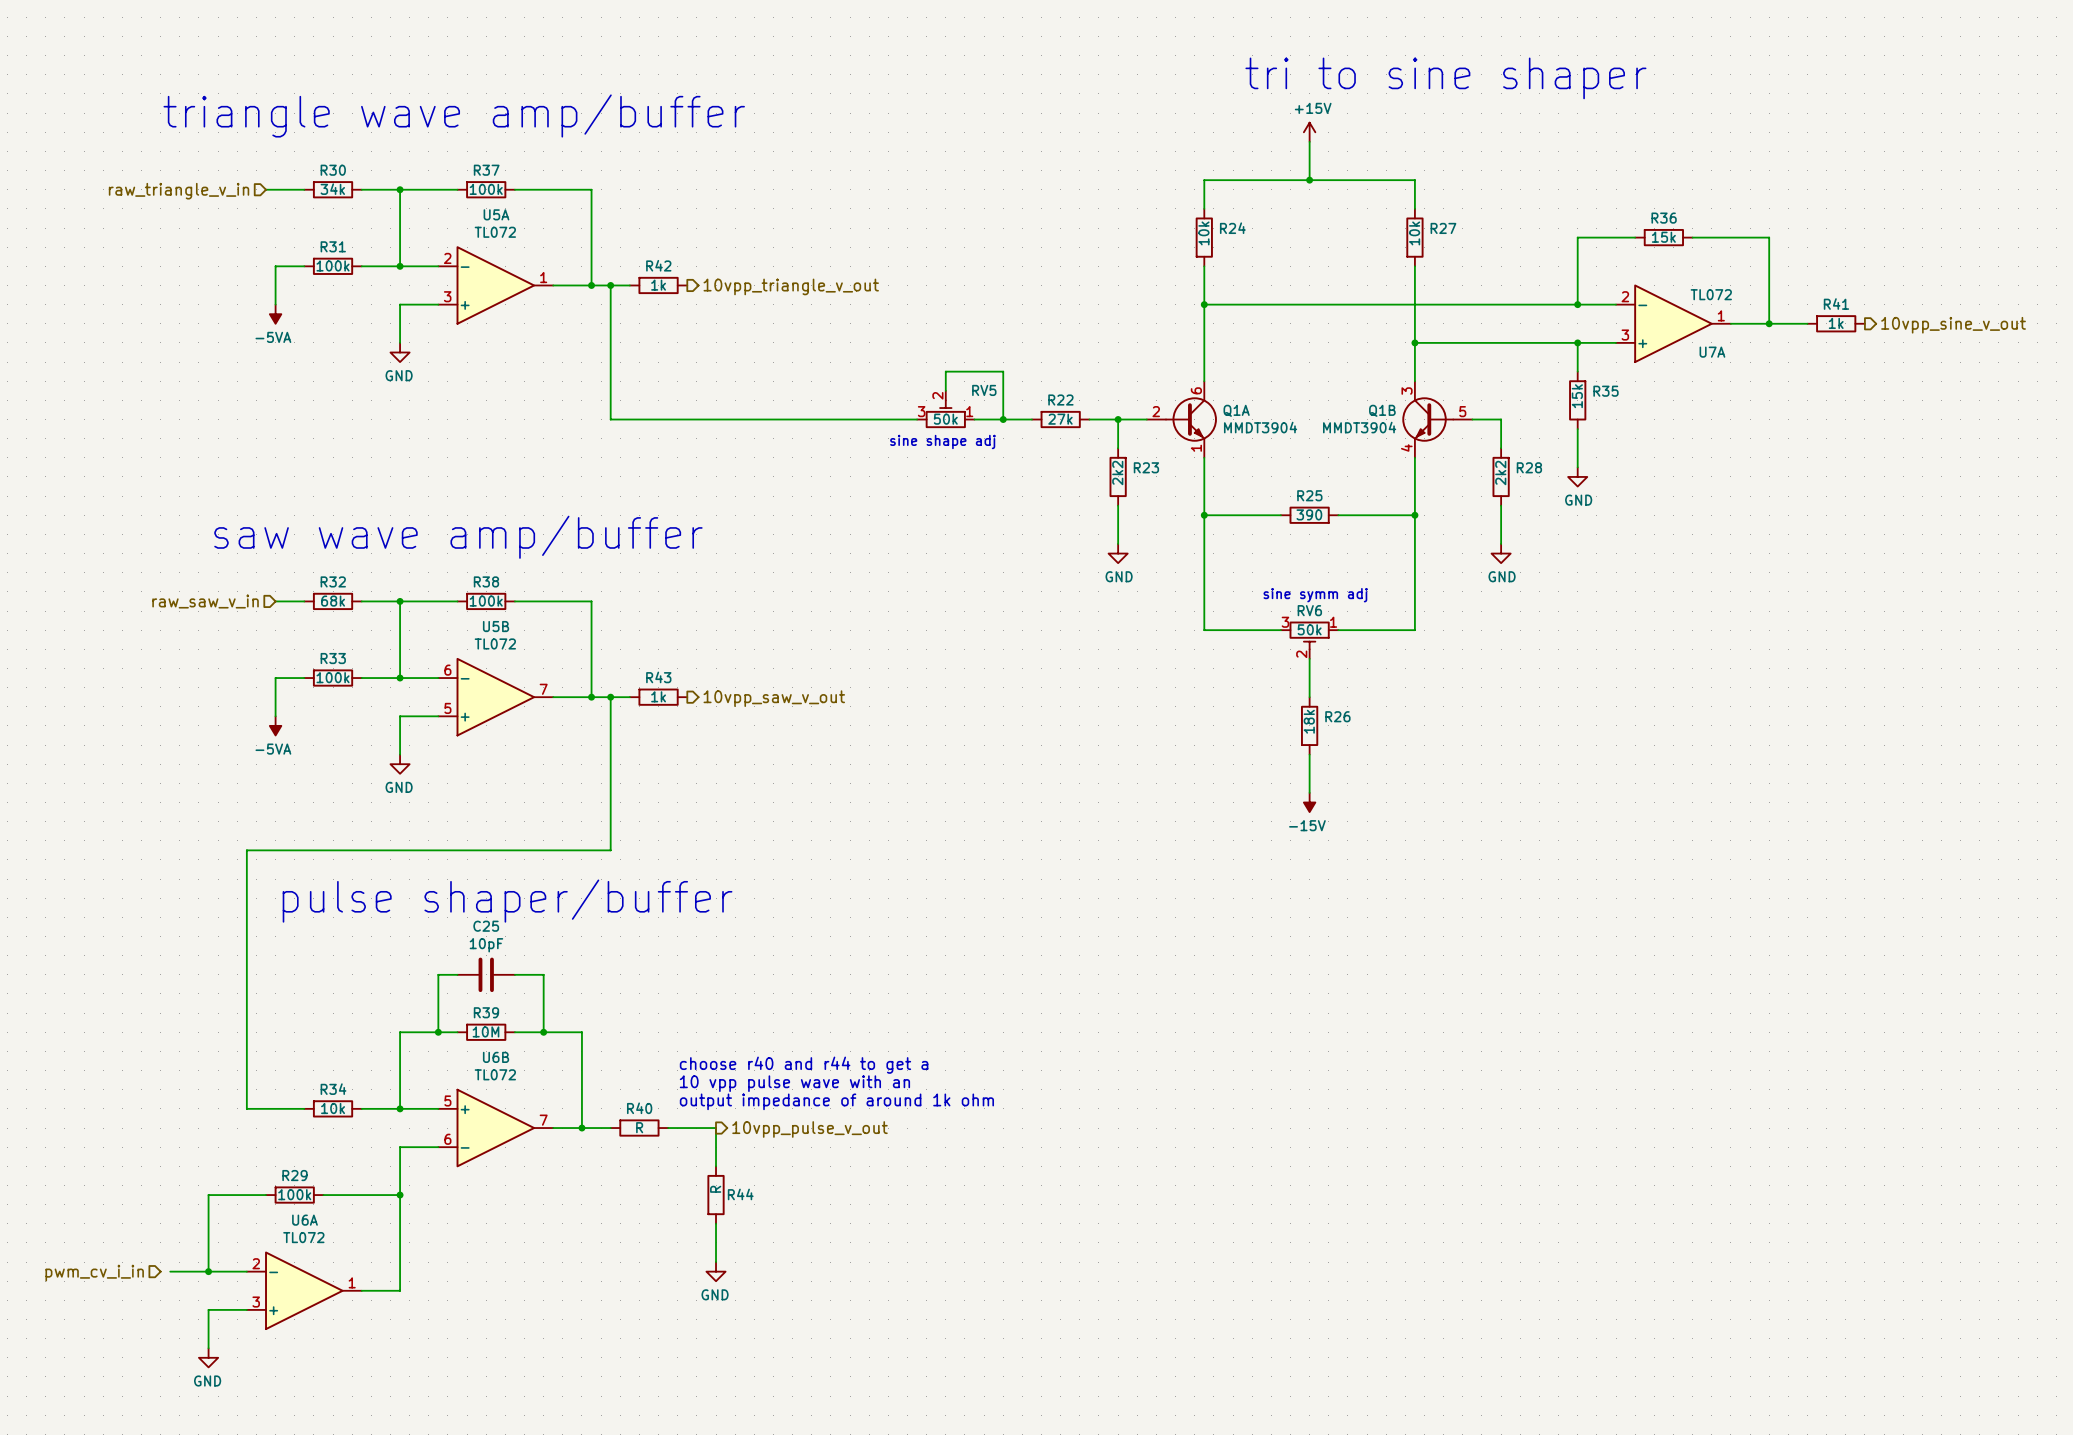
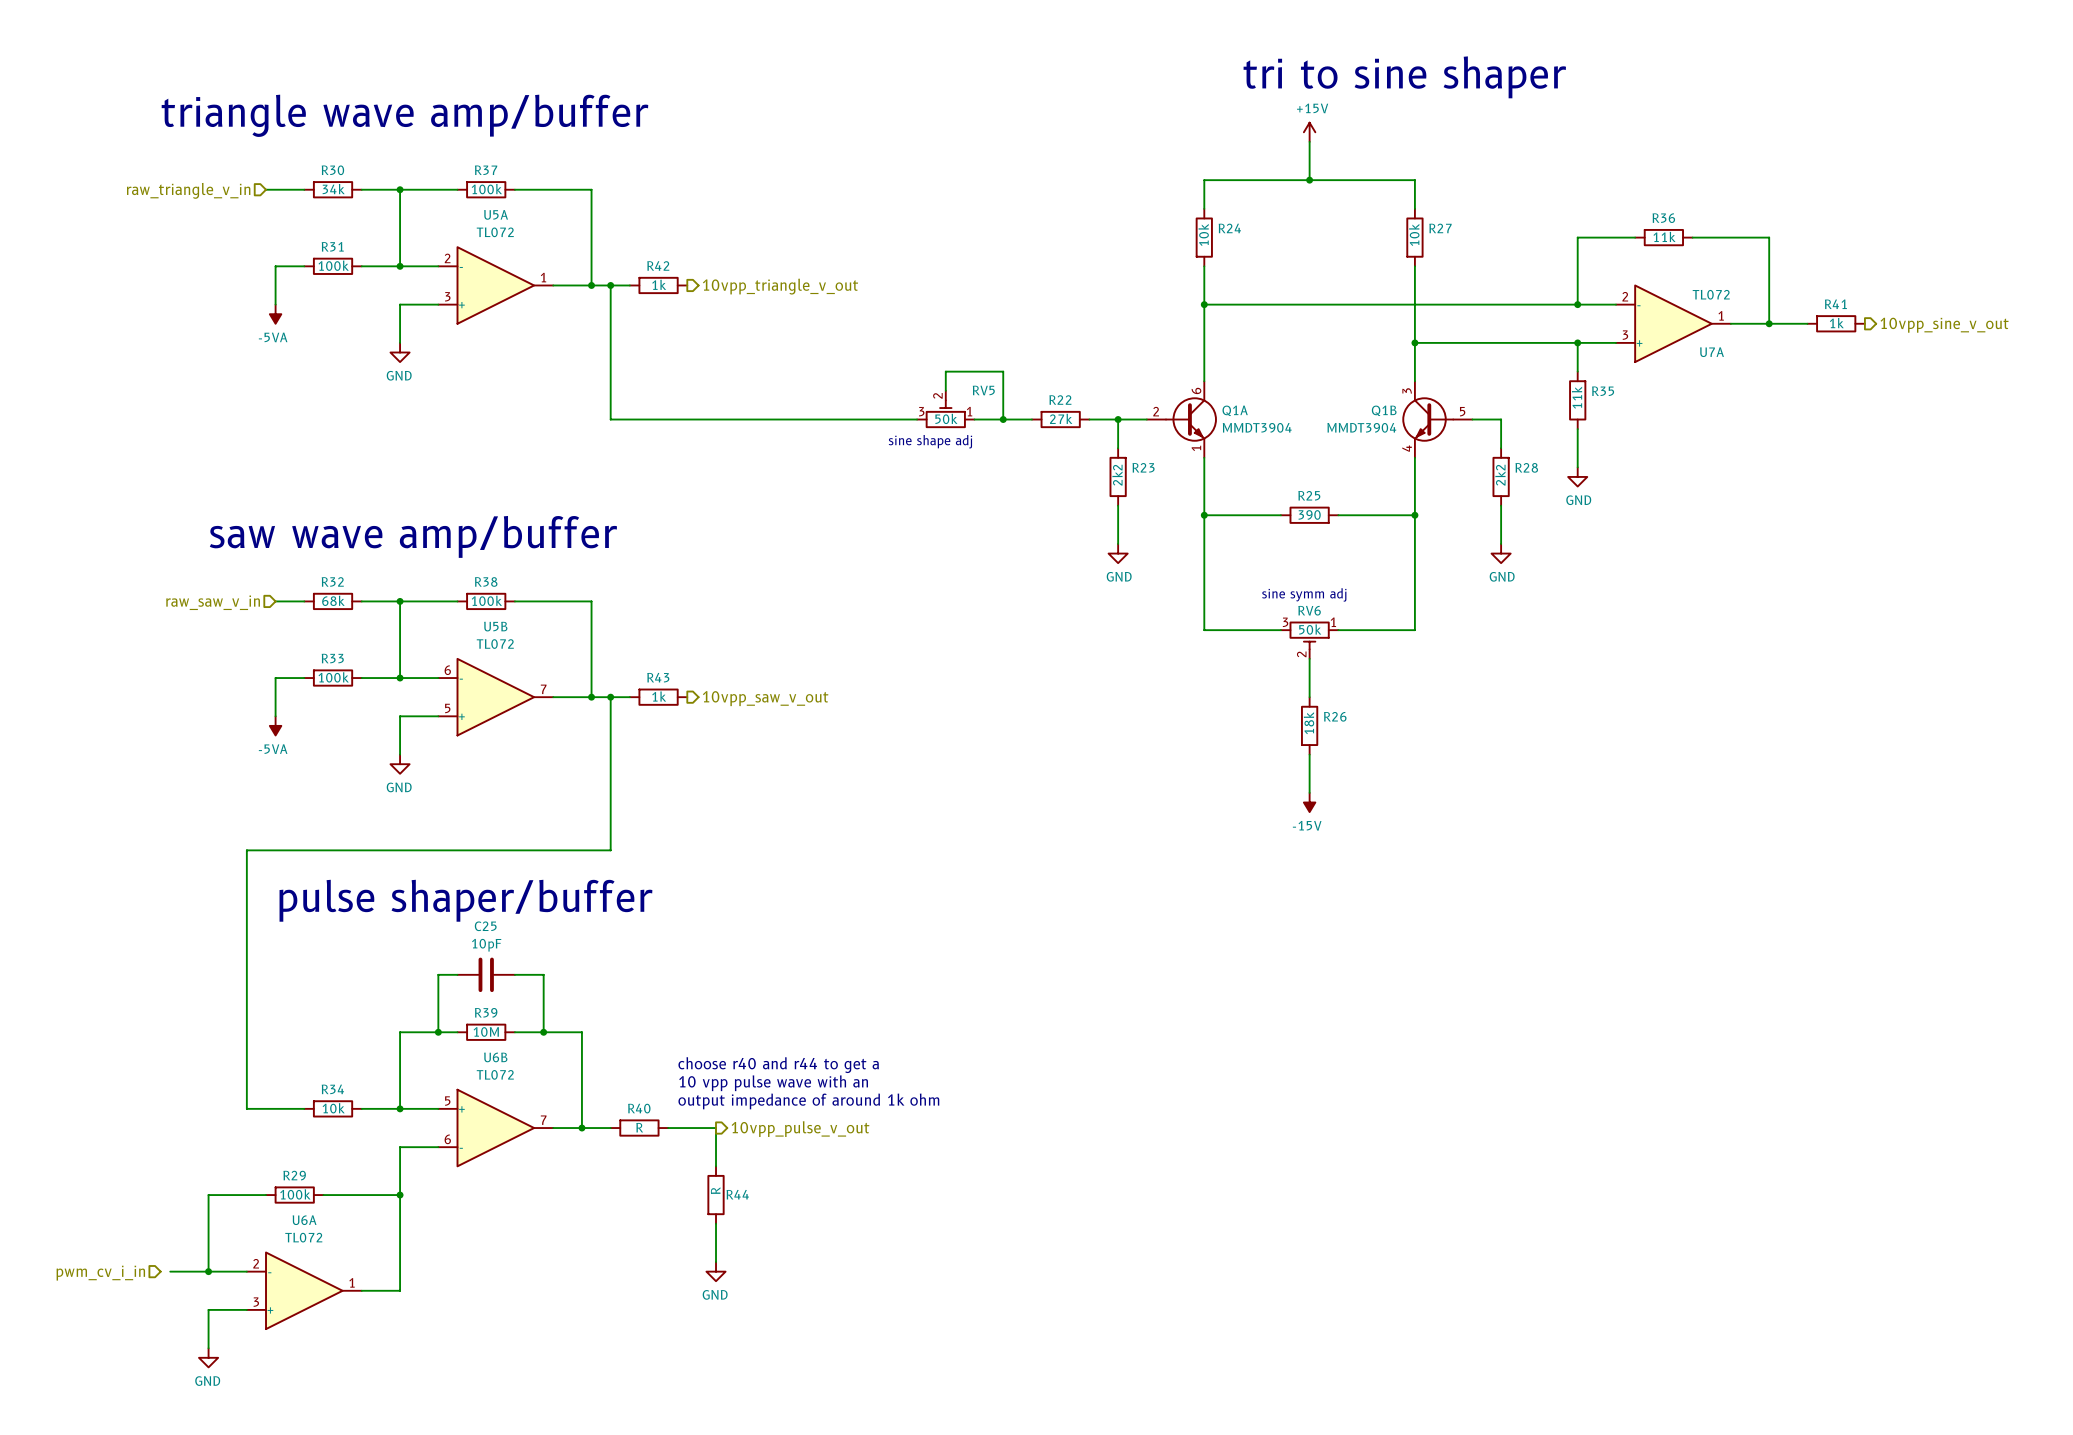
R36 value: 15k (1663, 237) -> 11k (1664, 236)
R35 value: 15k (1577, 396) -> 11k (1577, 397)

